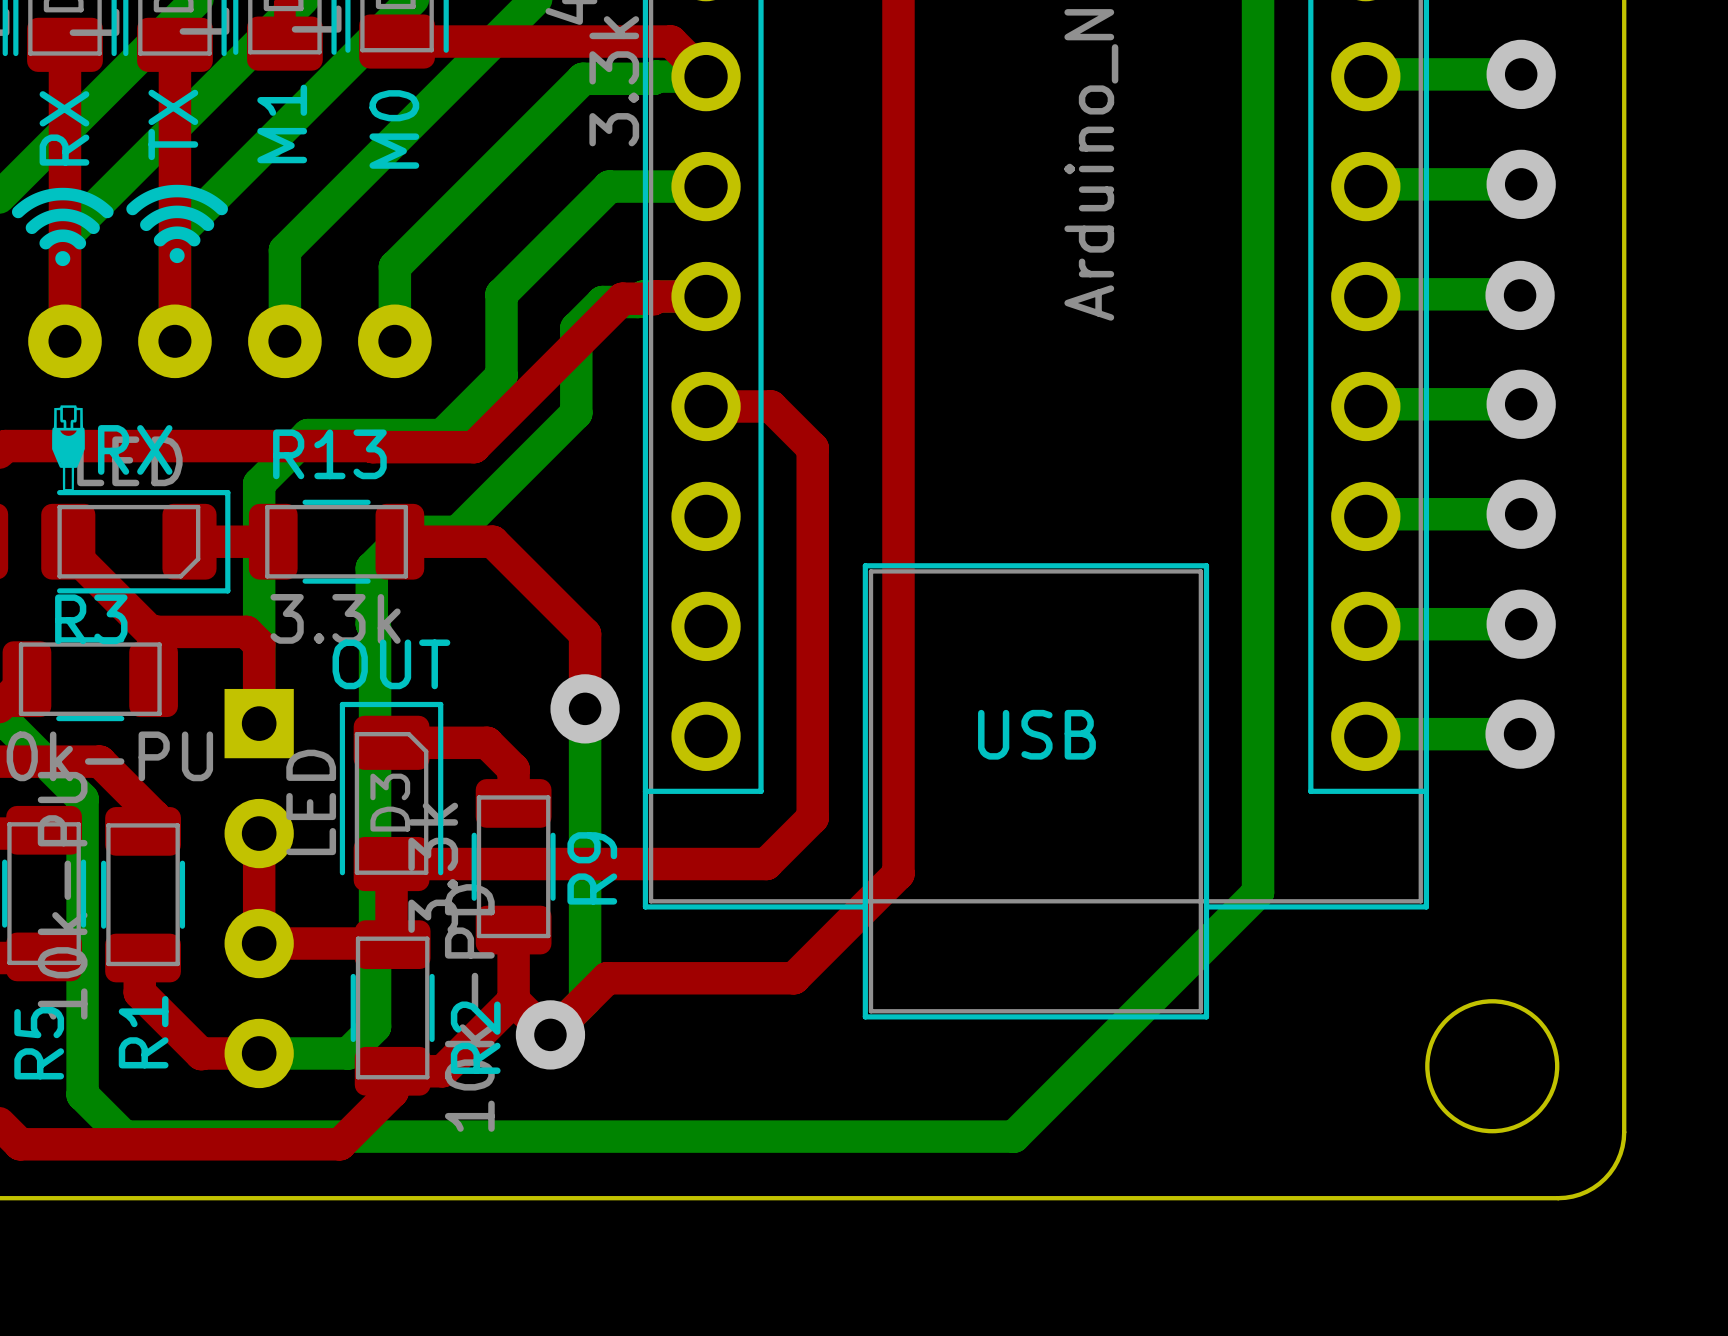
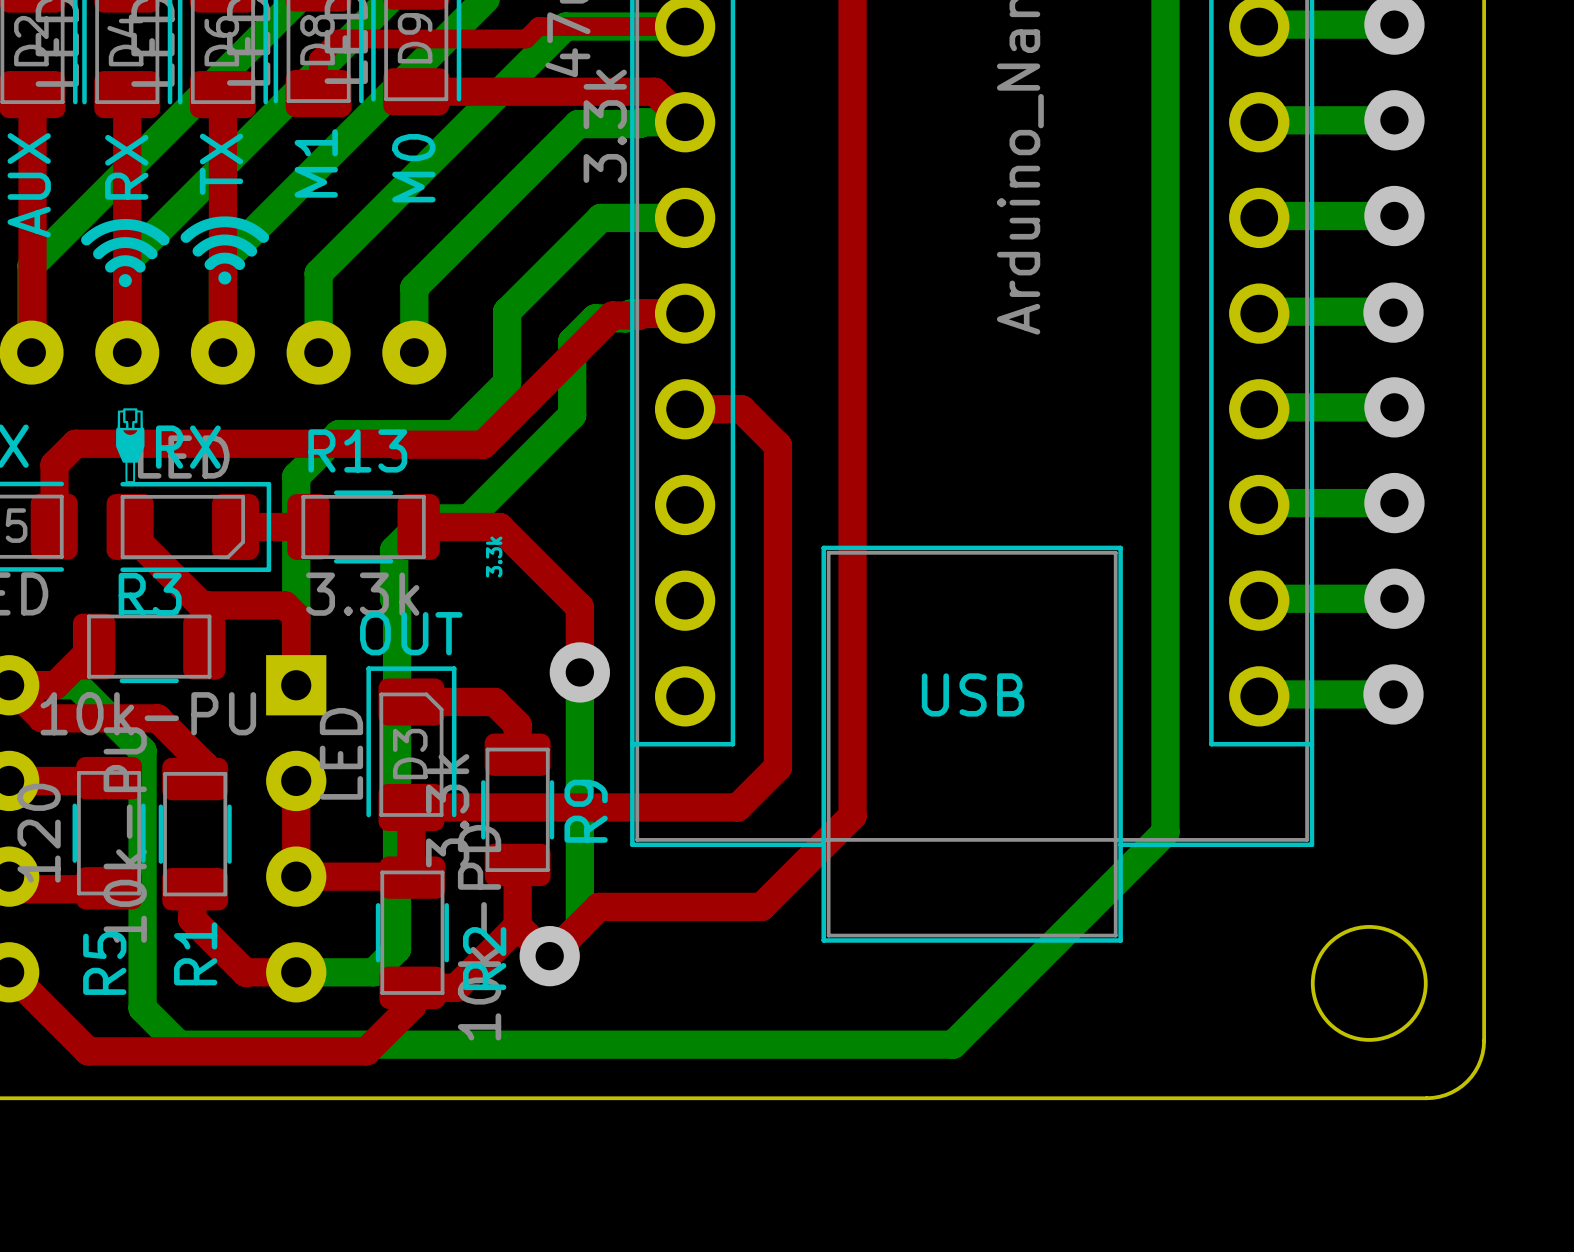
text: none -> 3.3k (494, 556)

